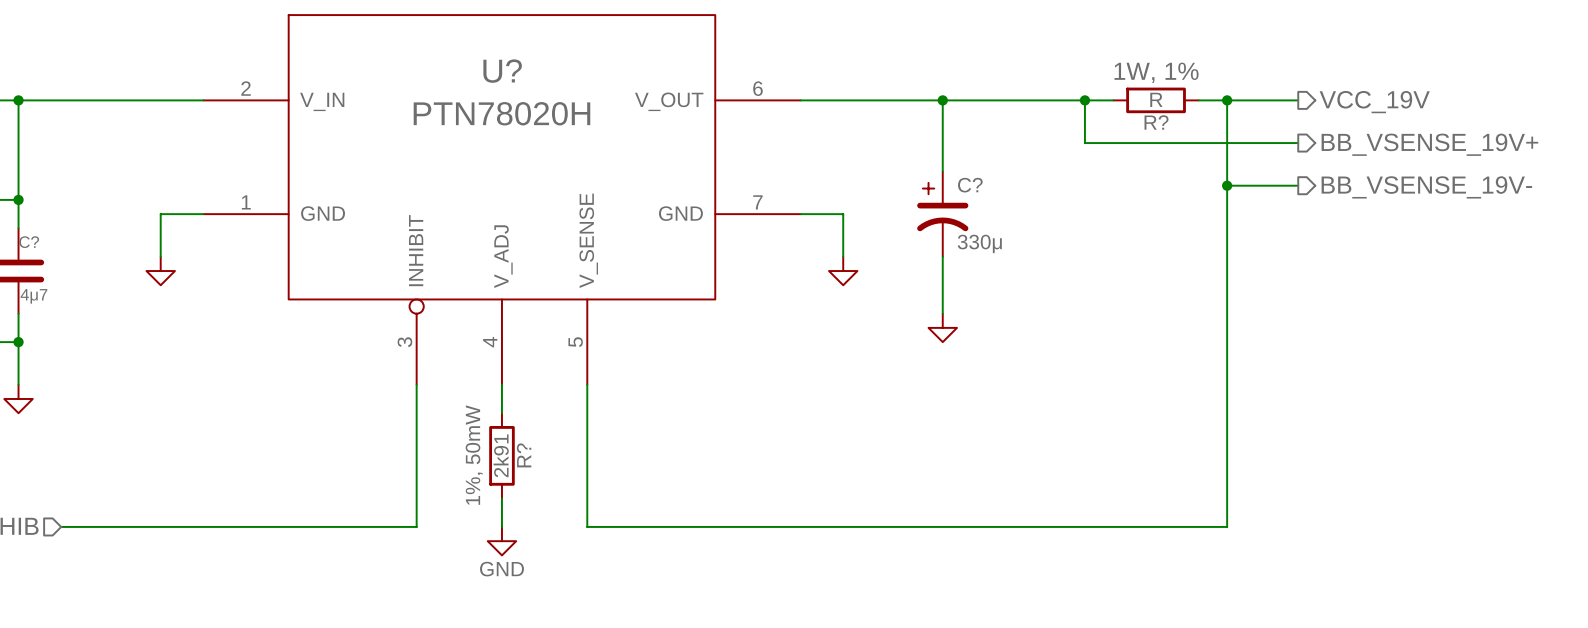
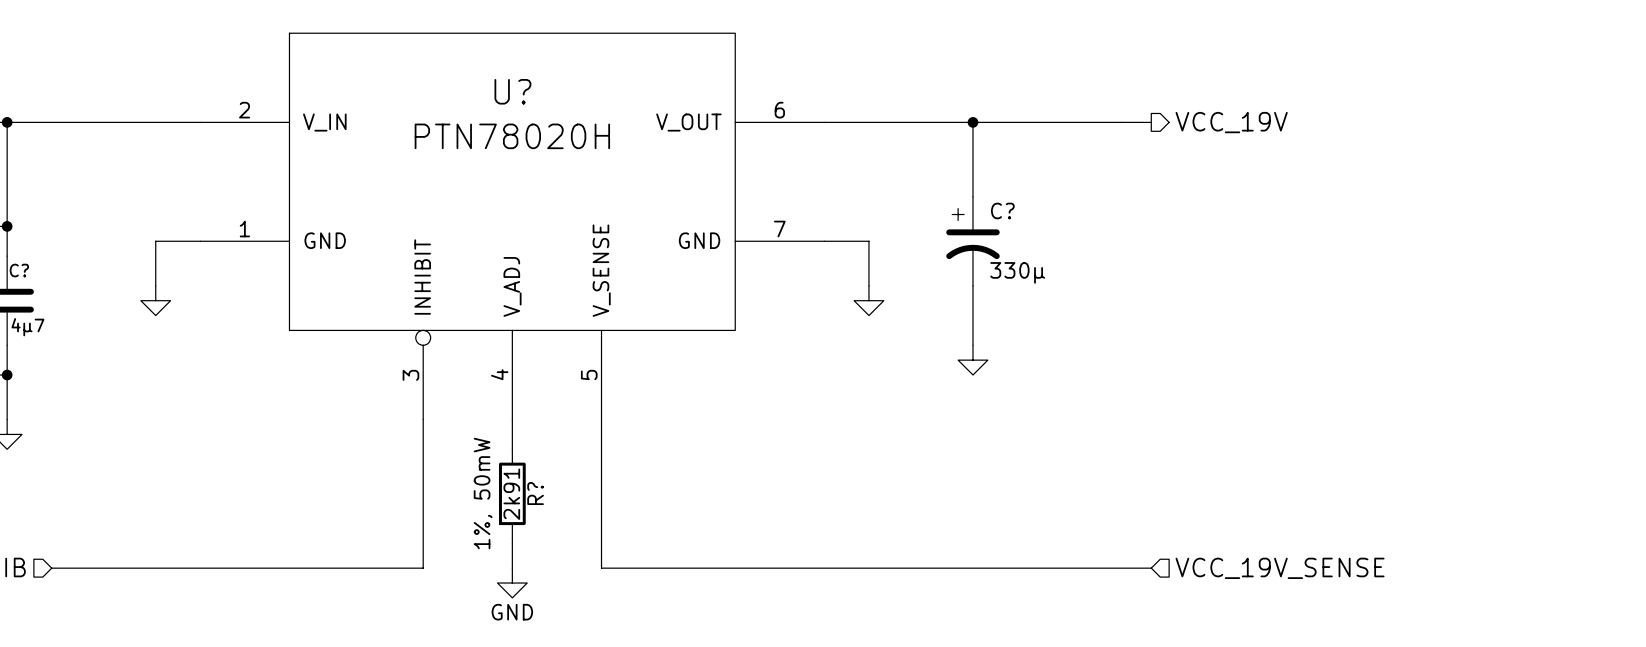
wire: (1084, 100) (1084, 143) (1298, 143) -> none
junction: (1084, 100) -> none
R?: R (1156, 100) -> none
wire: (1198, 100) (1298, 100) -> none
wire: (1227, 100) (1227, 526) (1113, 526) -> none
junction: (1227, 100) -> none
hierarchical label position: VCC_19V (1374, 102) -> VCC_19V (1231, 122)
hierarchical label: BB_VSENSE_19V+ (1429, 144) -> none
wire: (1227, 185) (1298, 185) -> none
junction: (1227, 185) -> none
hierarchical label: BB_VSENSE_19V- (1426, 187) -> none
hierarchical label: none -> VCC_19V_SENSE (1280, 568)

